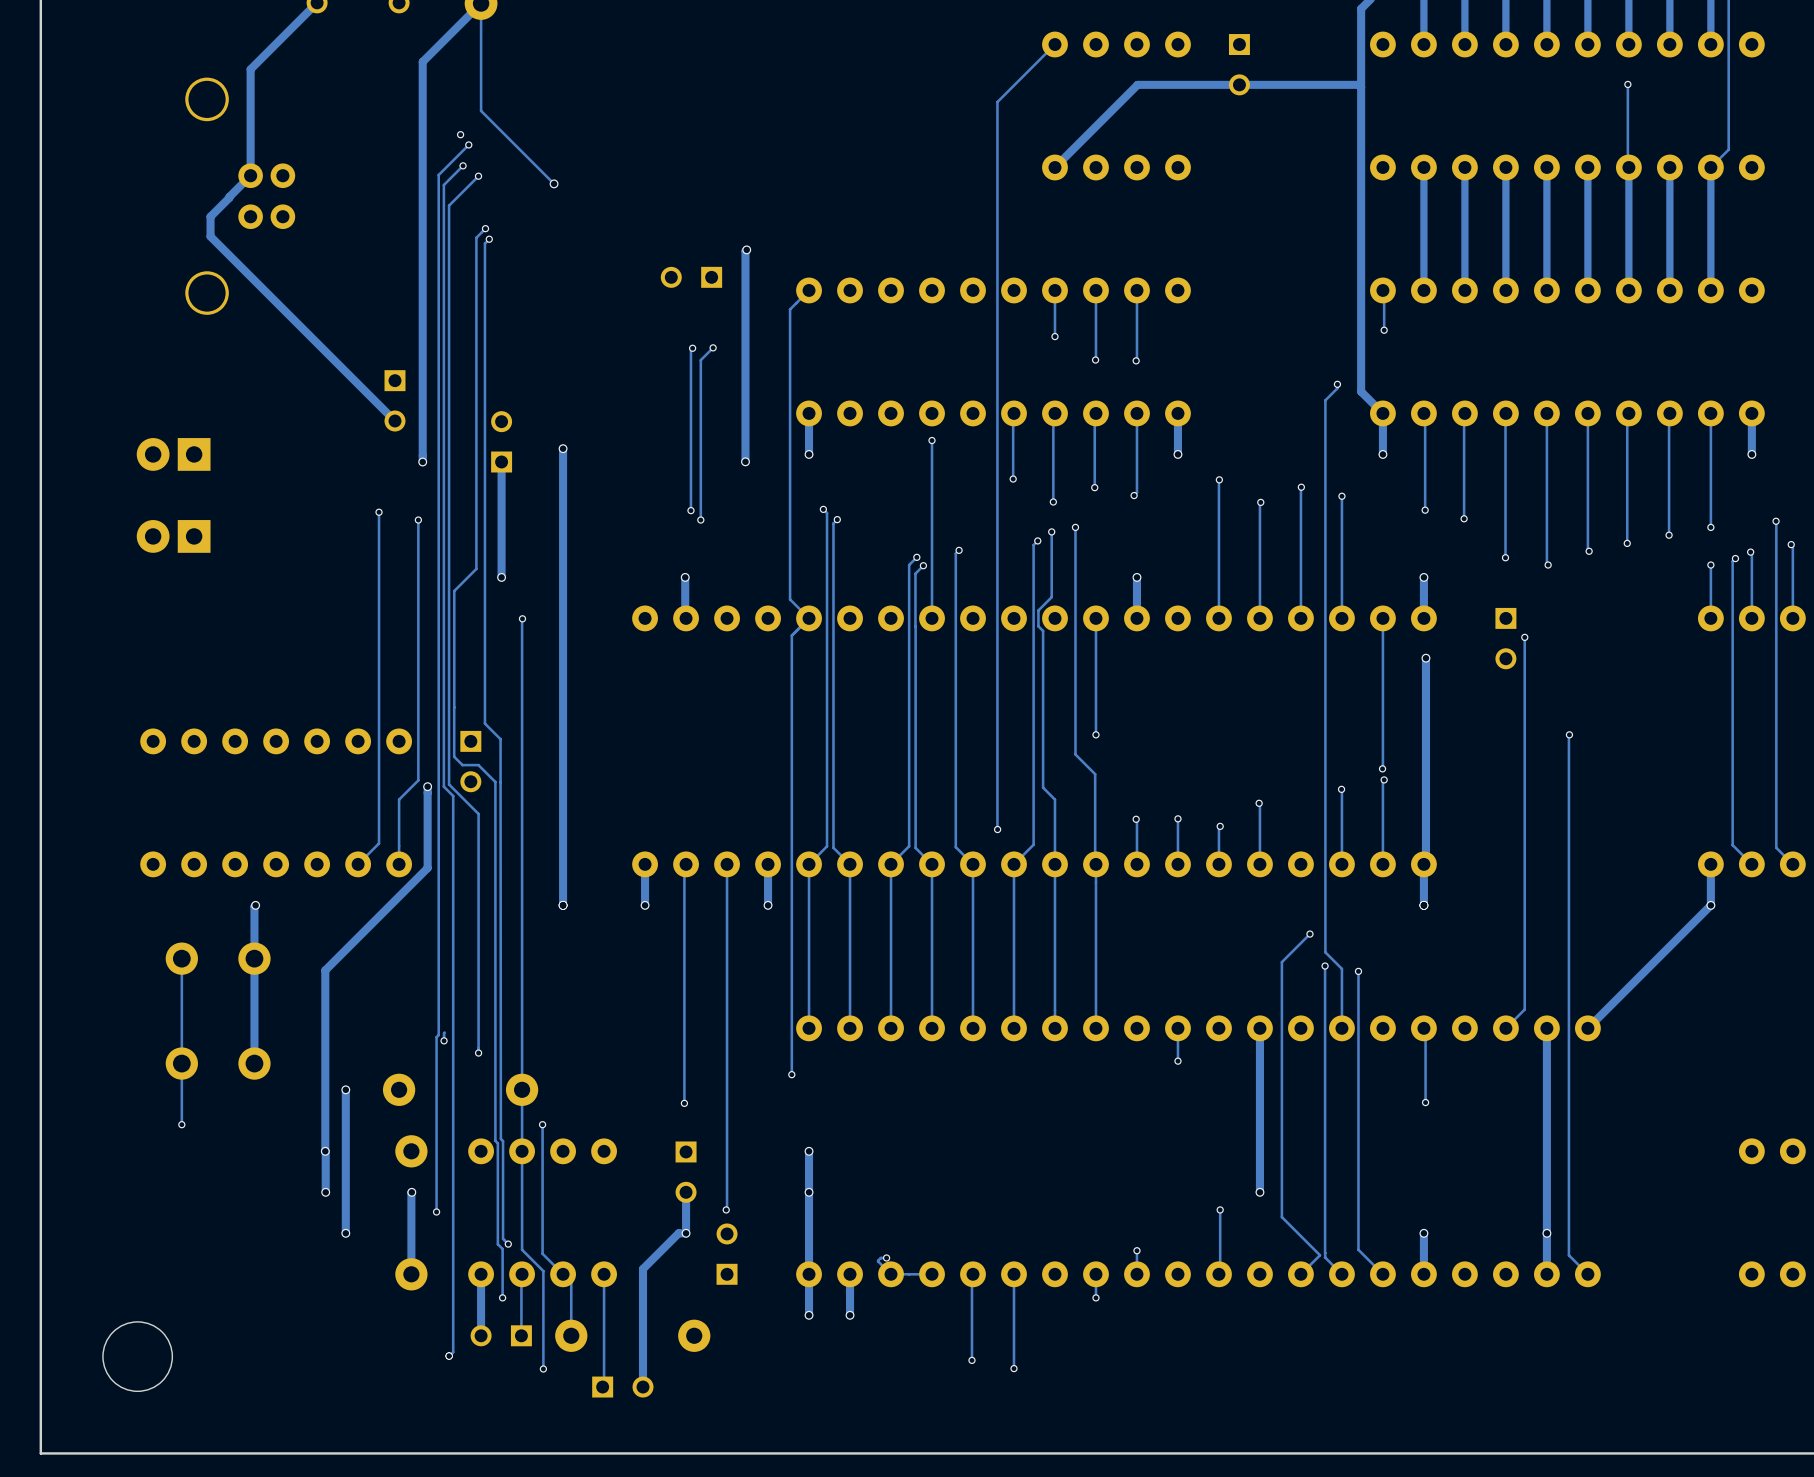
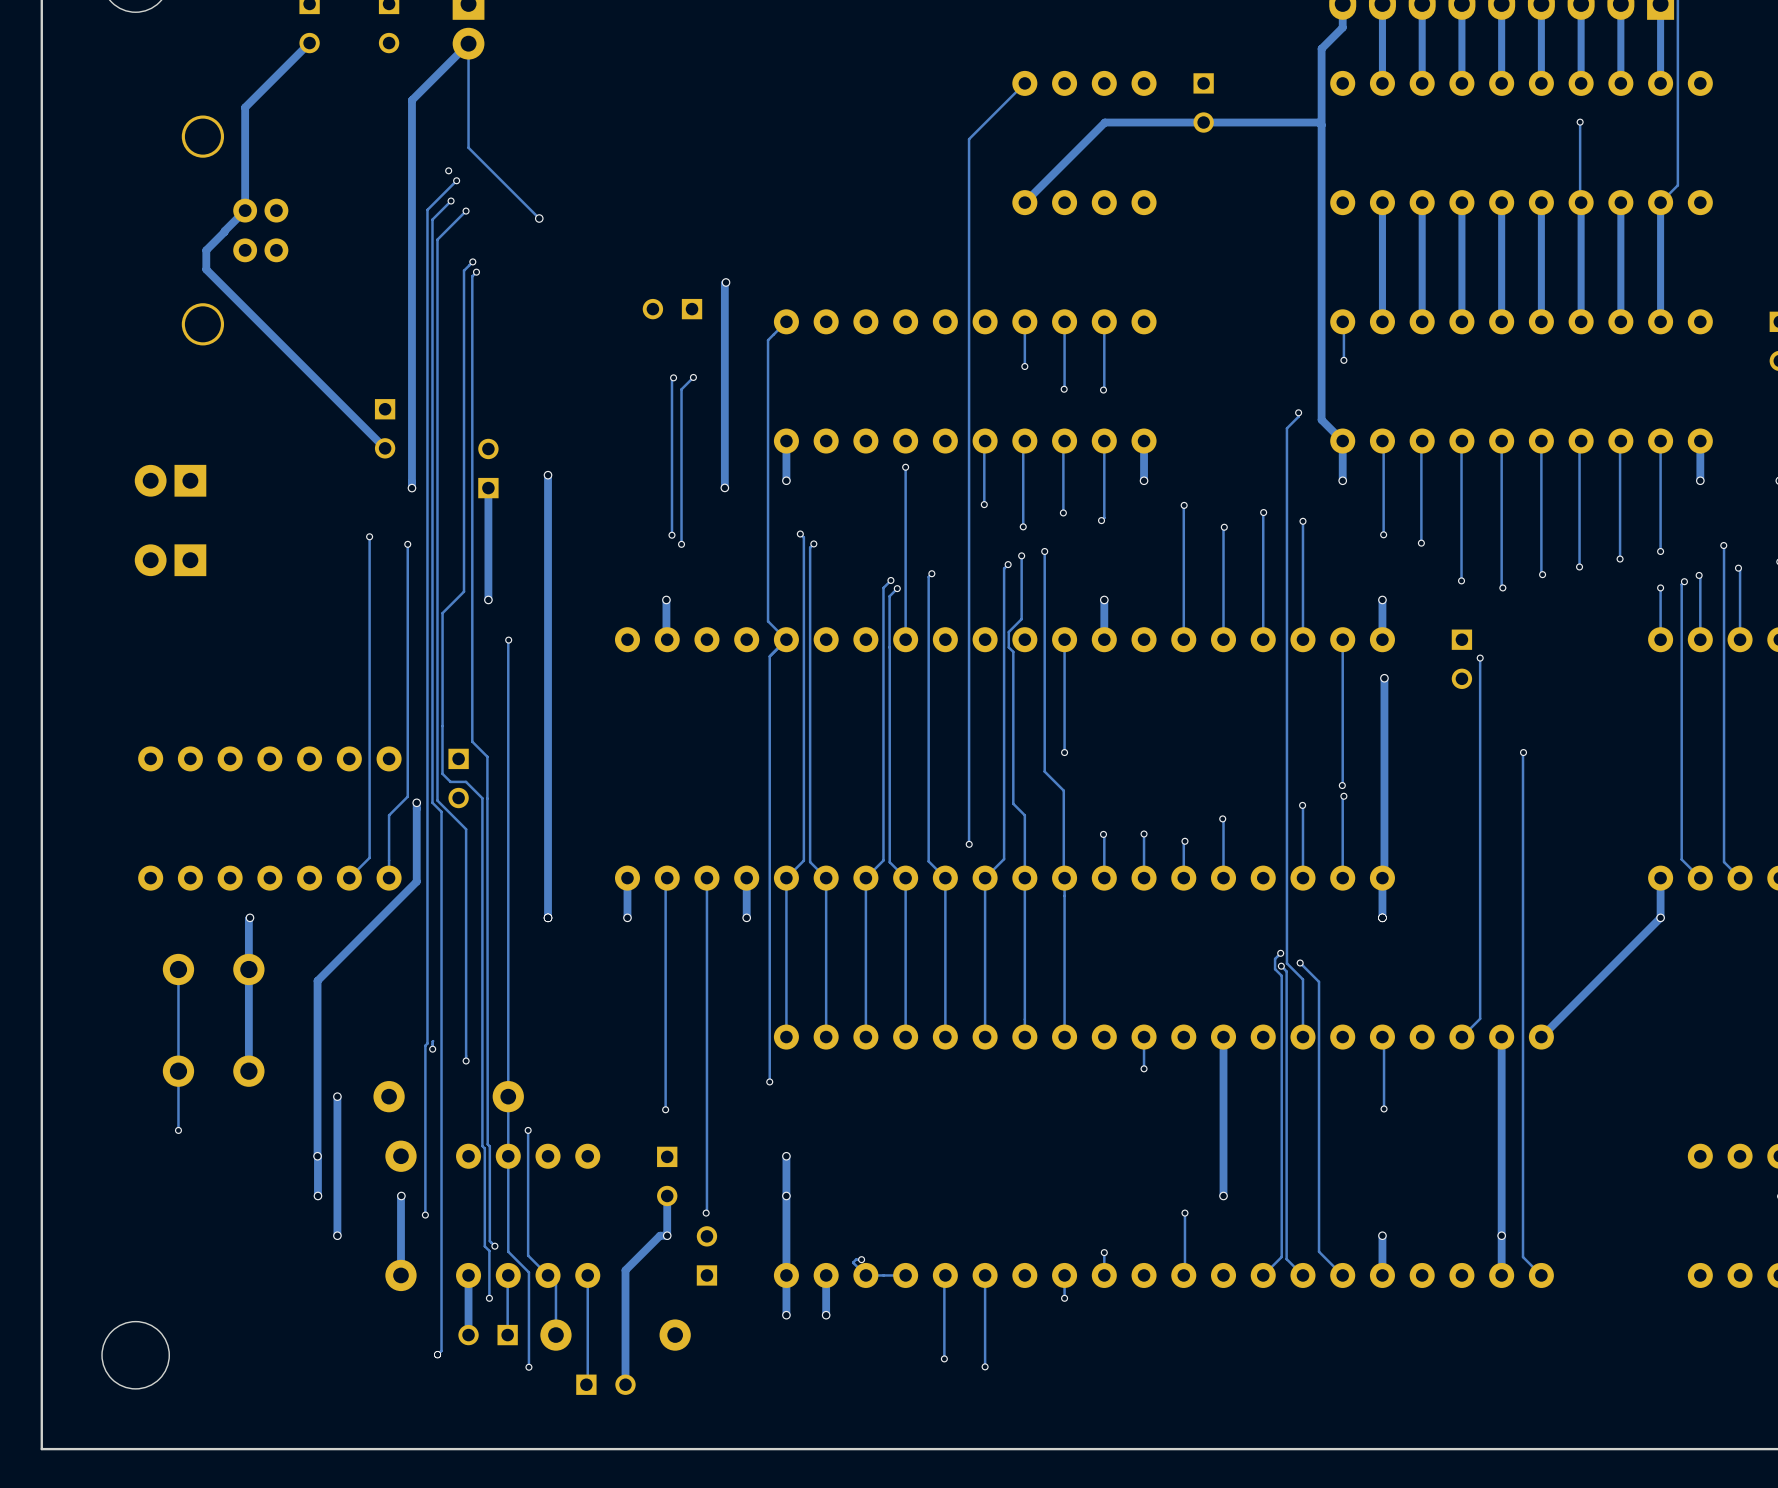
track: (1309, 934) (1281, 962) (1281, 1217) (1320, 1255) -> (1280, 953) (1275, 958) (1275, 969) (1281, 975) (1281, 1256)
via: (1309, 934) -> none
via: none -> (1280, 953)
track: none -> (1300, 963) (1319, 981)
via: none -> (1300, 963)
track: none -> (1281, 966) (1286, 971) (1286, 976)
via: none -> (1281, 966)
via: (1325, 966) -> none
via: (1358, 971) -> none

